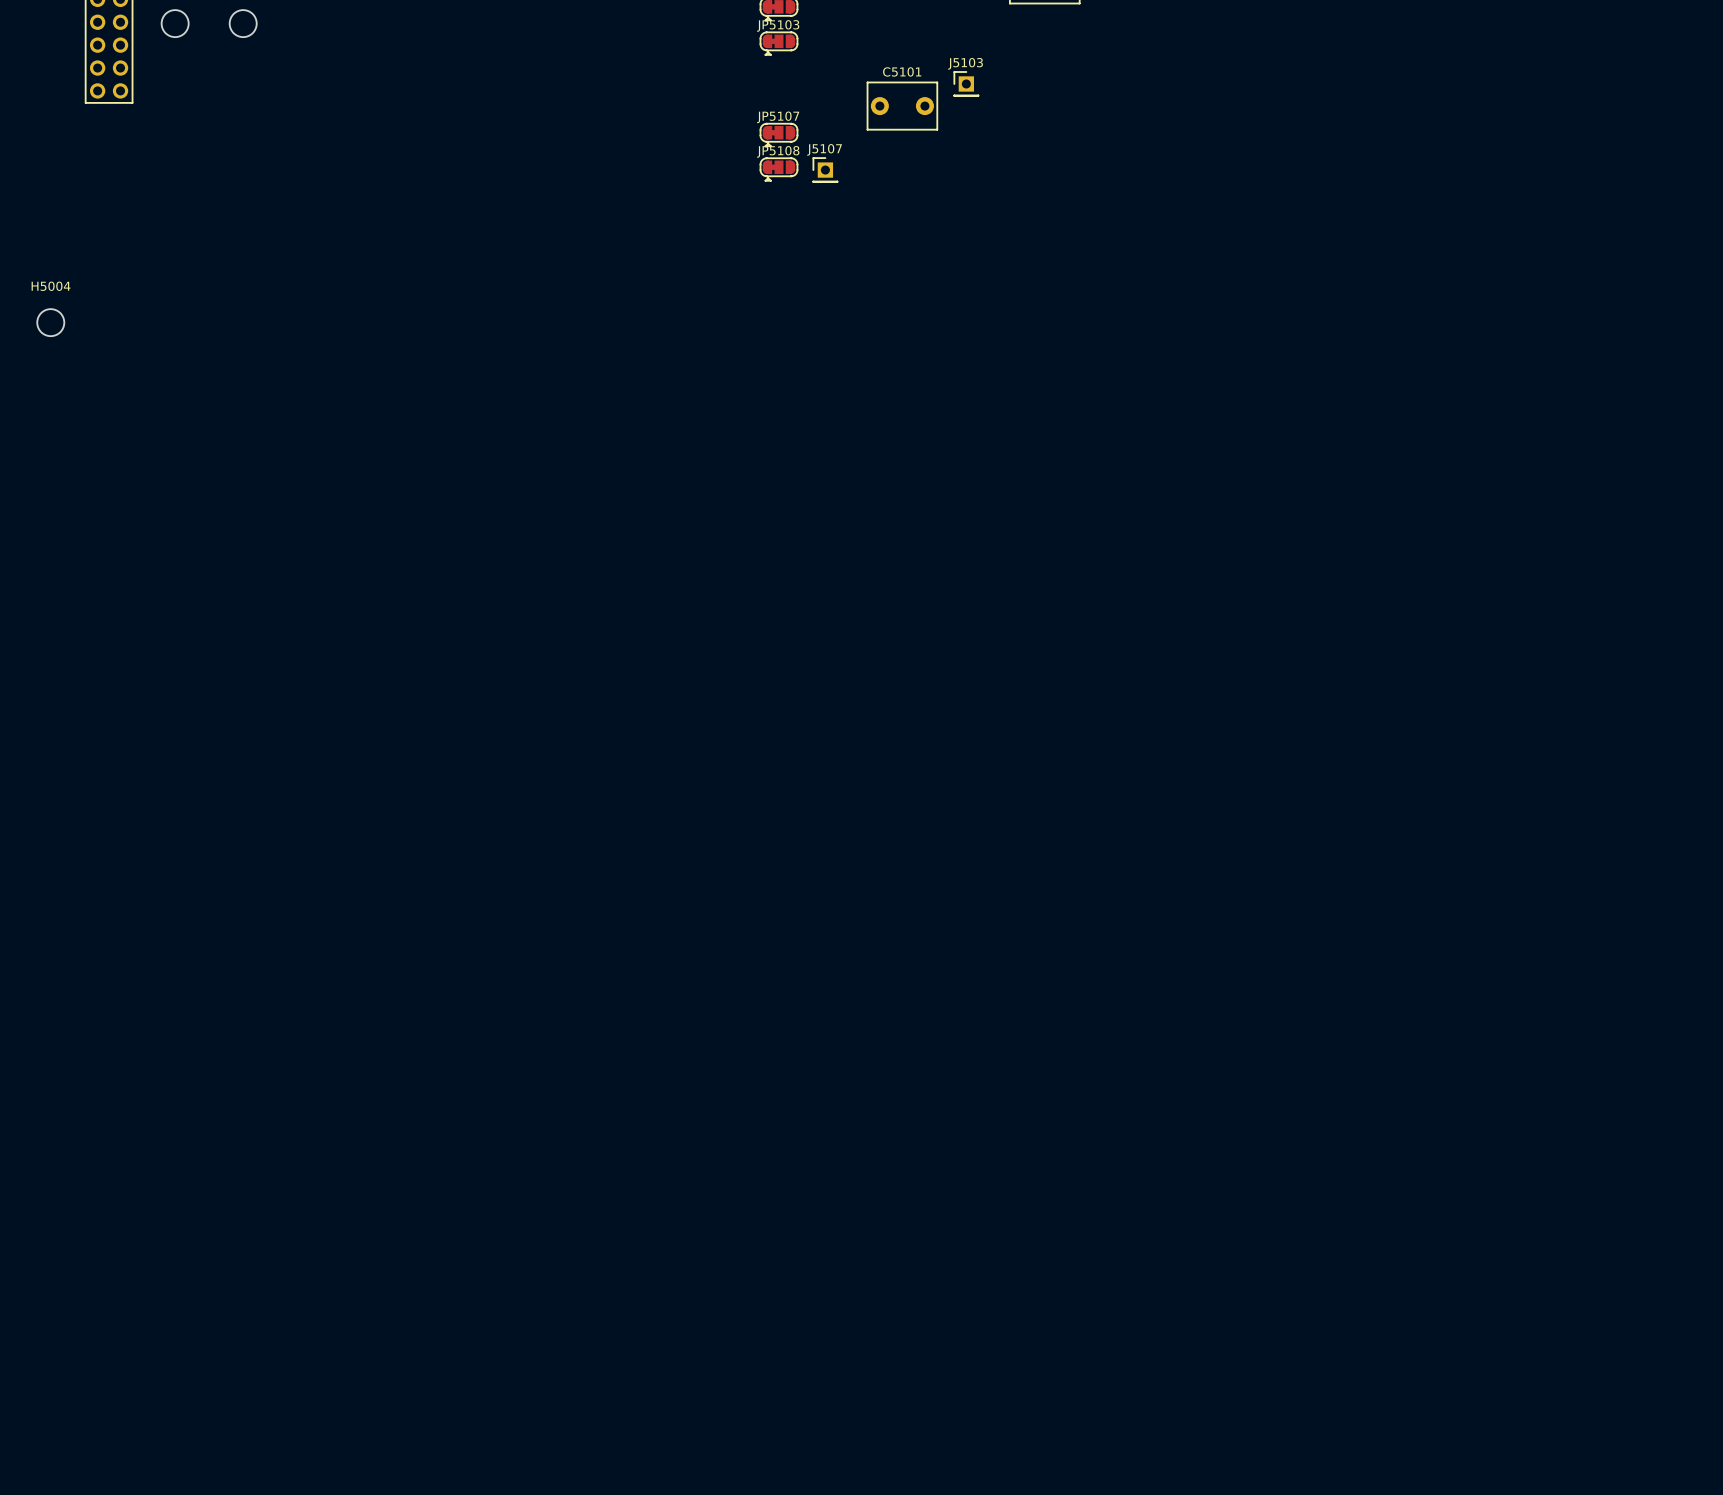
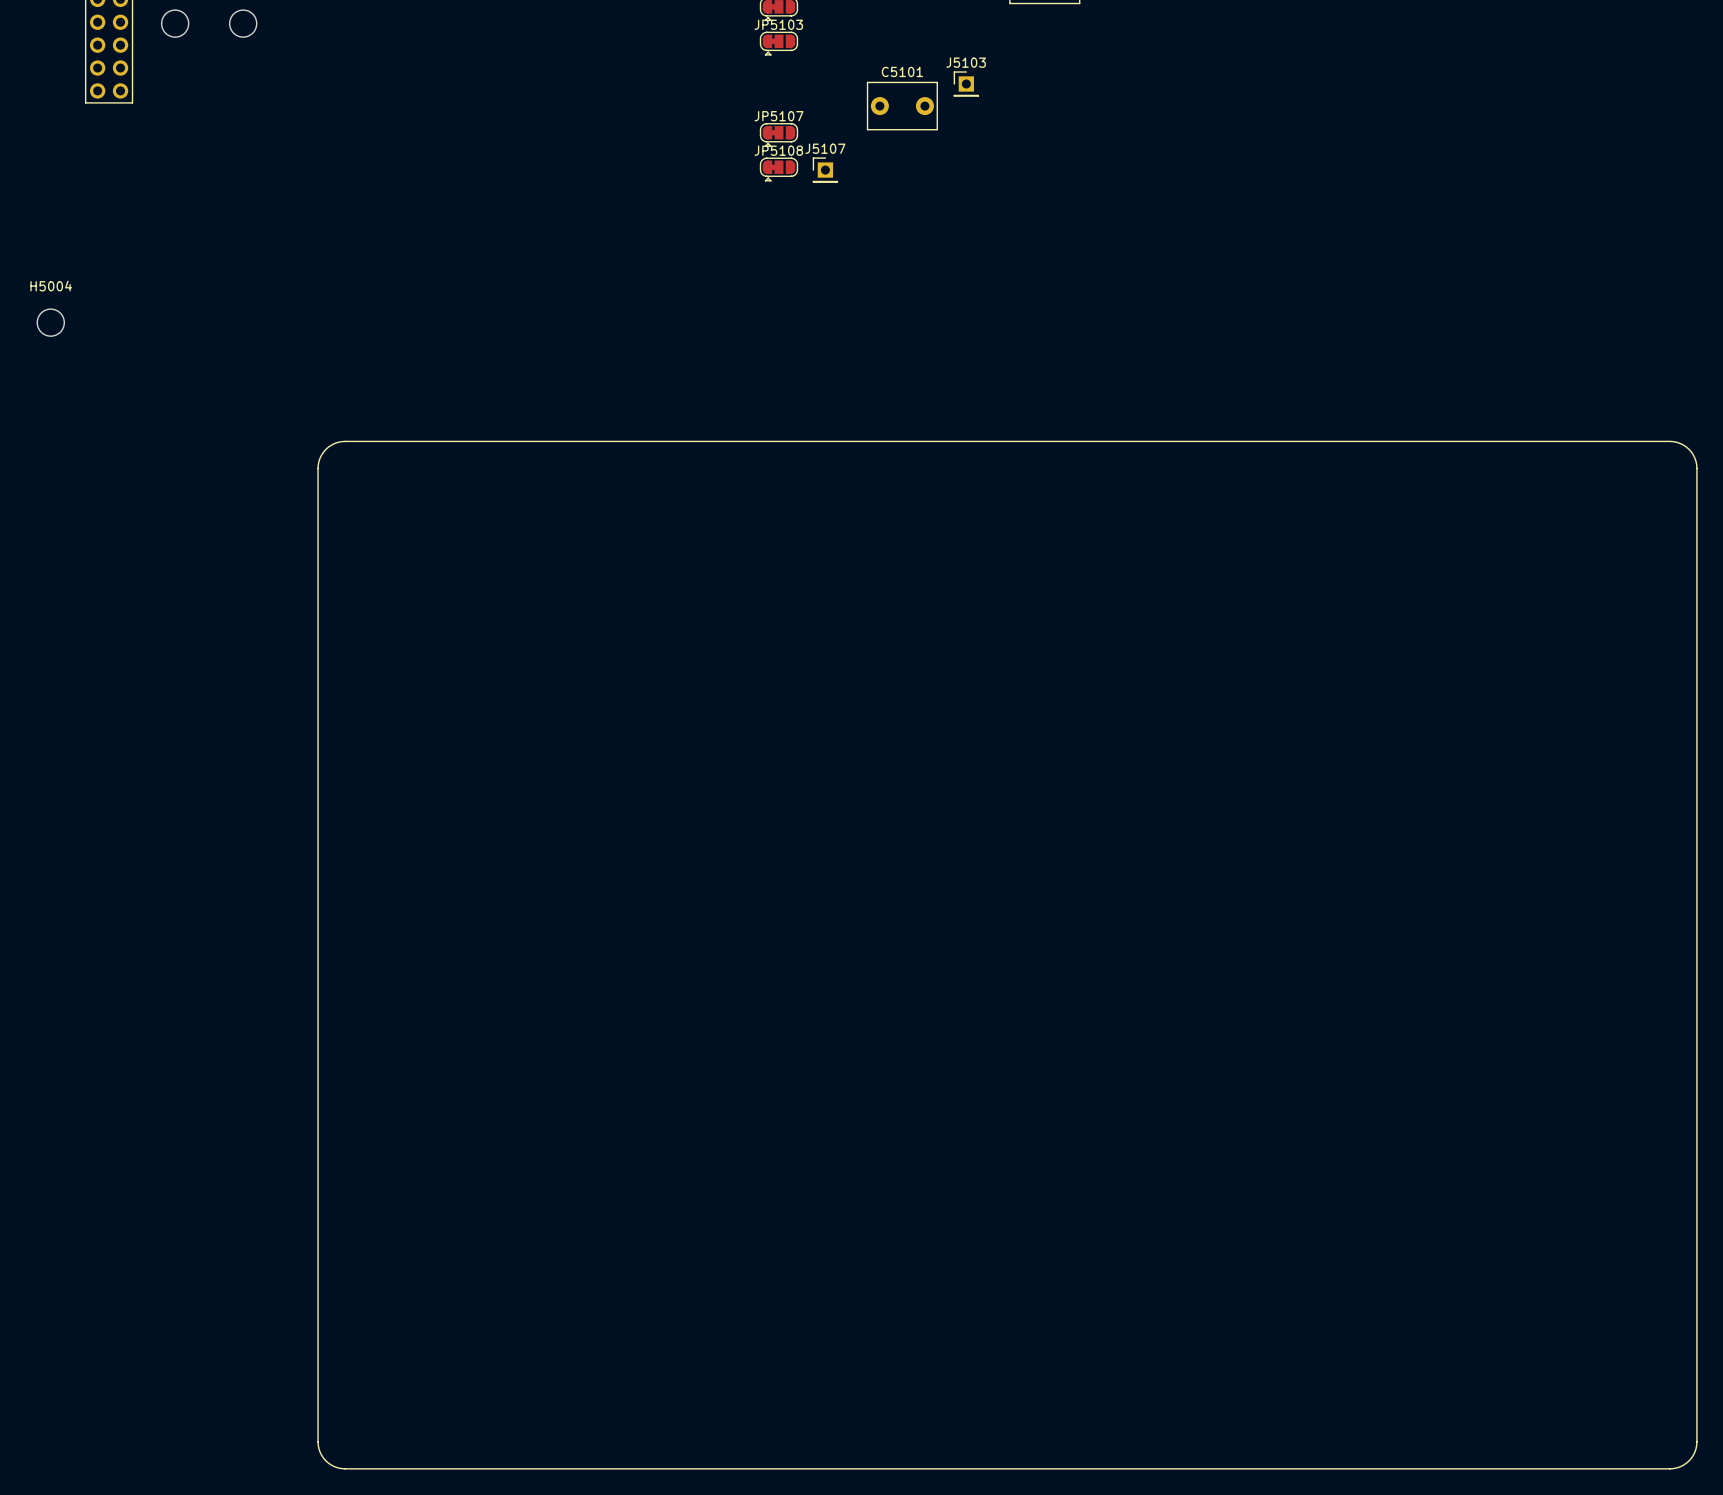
line: none -> (345, 441) (1669, 441) (1686, 447) (1693, 454) (1696, 468) (1696, 1441) (1691, 1458) (1683, 1465) (1669, 1468) (345, 1468) (328, 1463) (320, 1452) (318, 1441) (318, 468) (320, 458) (325, 449) (334, 443) (345, 441)

